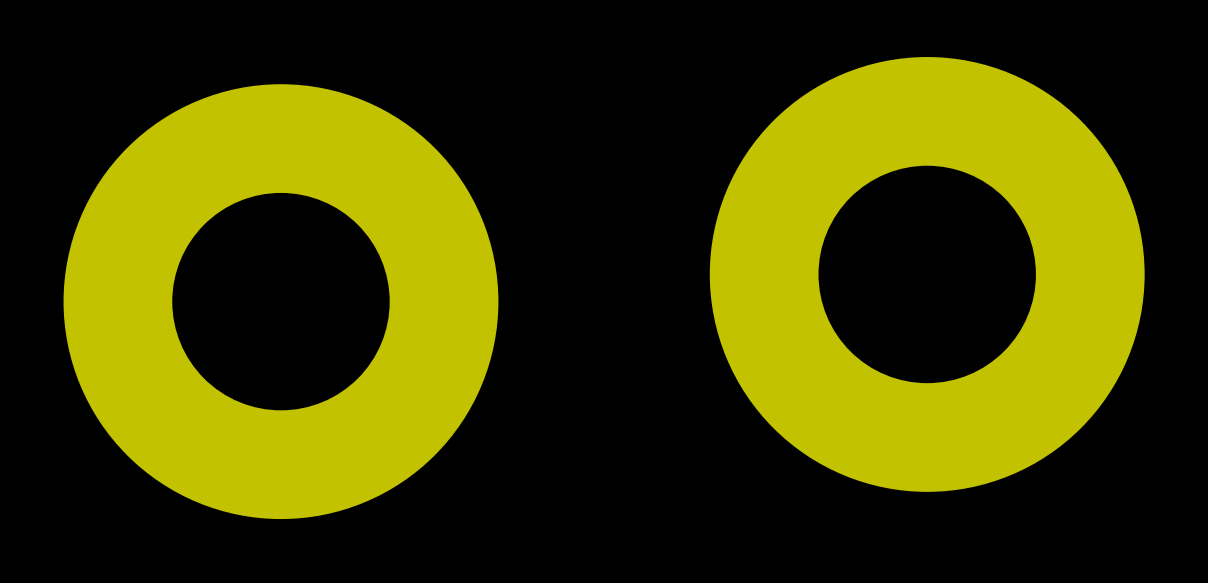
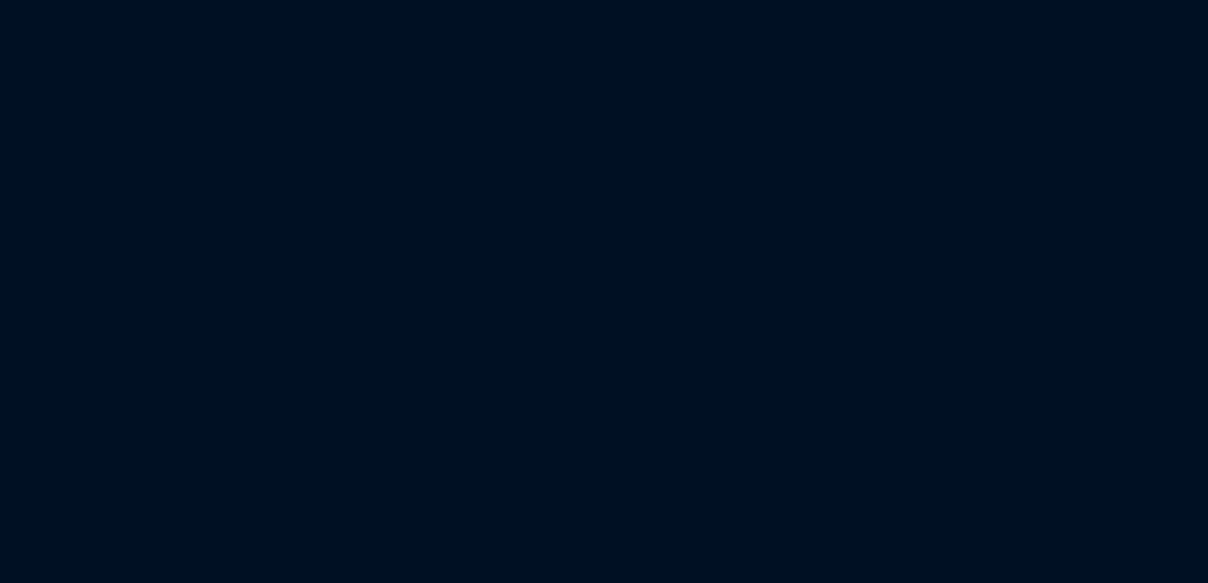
part: (927, 274) -> none
part: (280, 301) -> none

